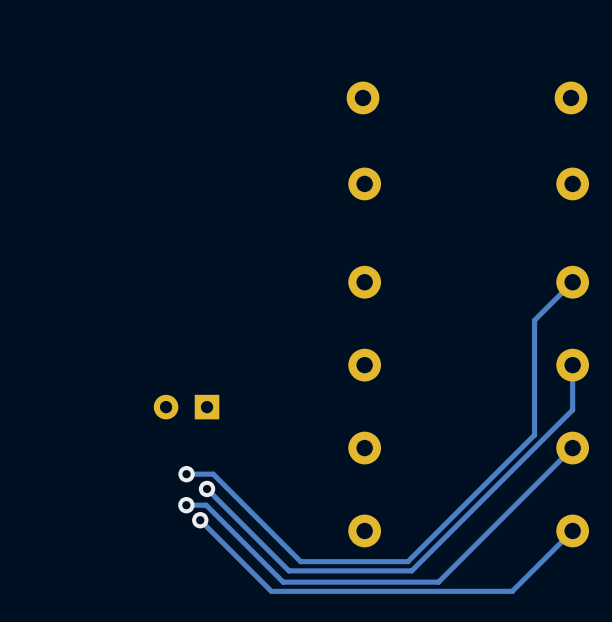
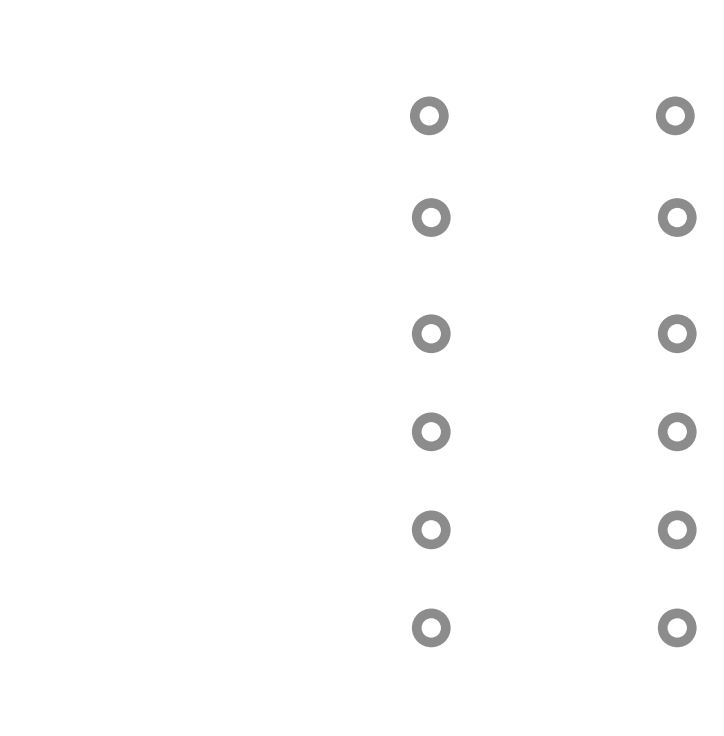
track: (572, 282) (534, 320) (534, 435) (407, 561) (300, 561) (213, 474) (186, 474) -> none
track: (572, 365) (572, 409) (411, 570) (288, 570) (207, 488) -> none
part: (186, 407) -> none
track: (572, 448) (438, 582) (283, 582) (206, 505) (186, 505) -> none
via: (186, 474) -> none
via: (207, 488) -> none
via: (186, 505) -> none
track: (200, 520) (271, 591) (512, 591) (572, 530) -> none
via: (200, 520) -> none

